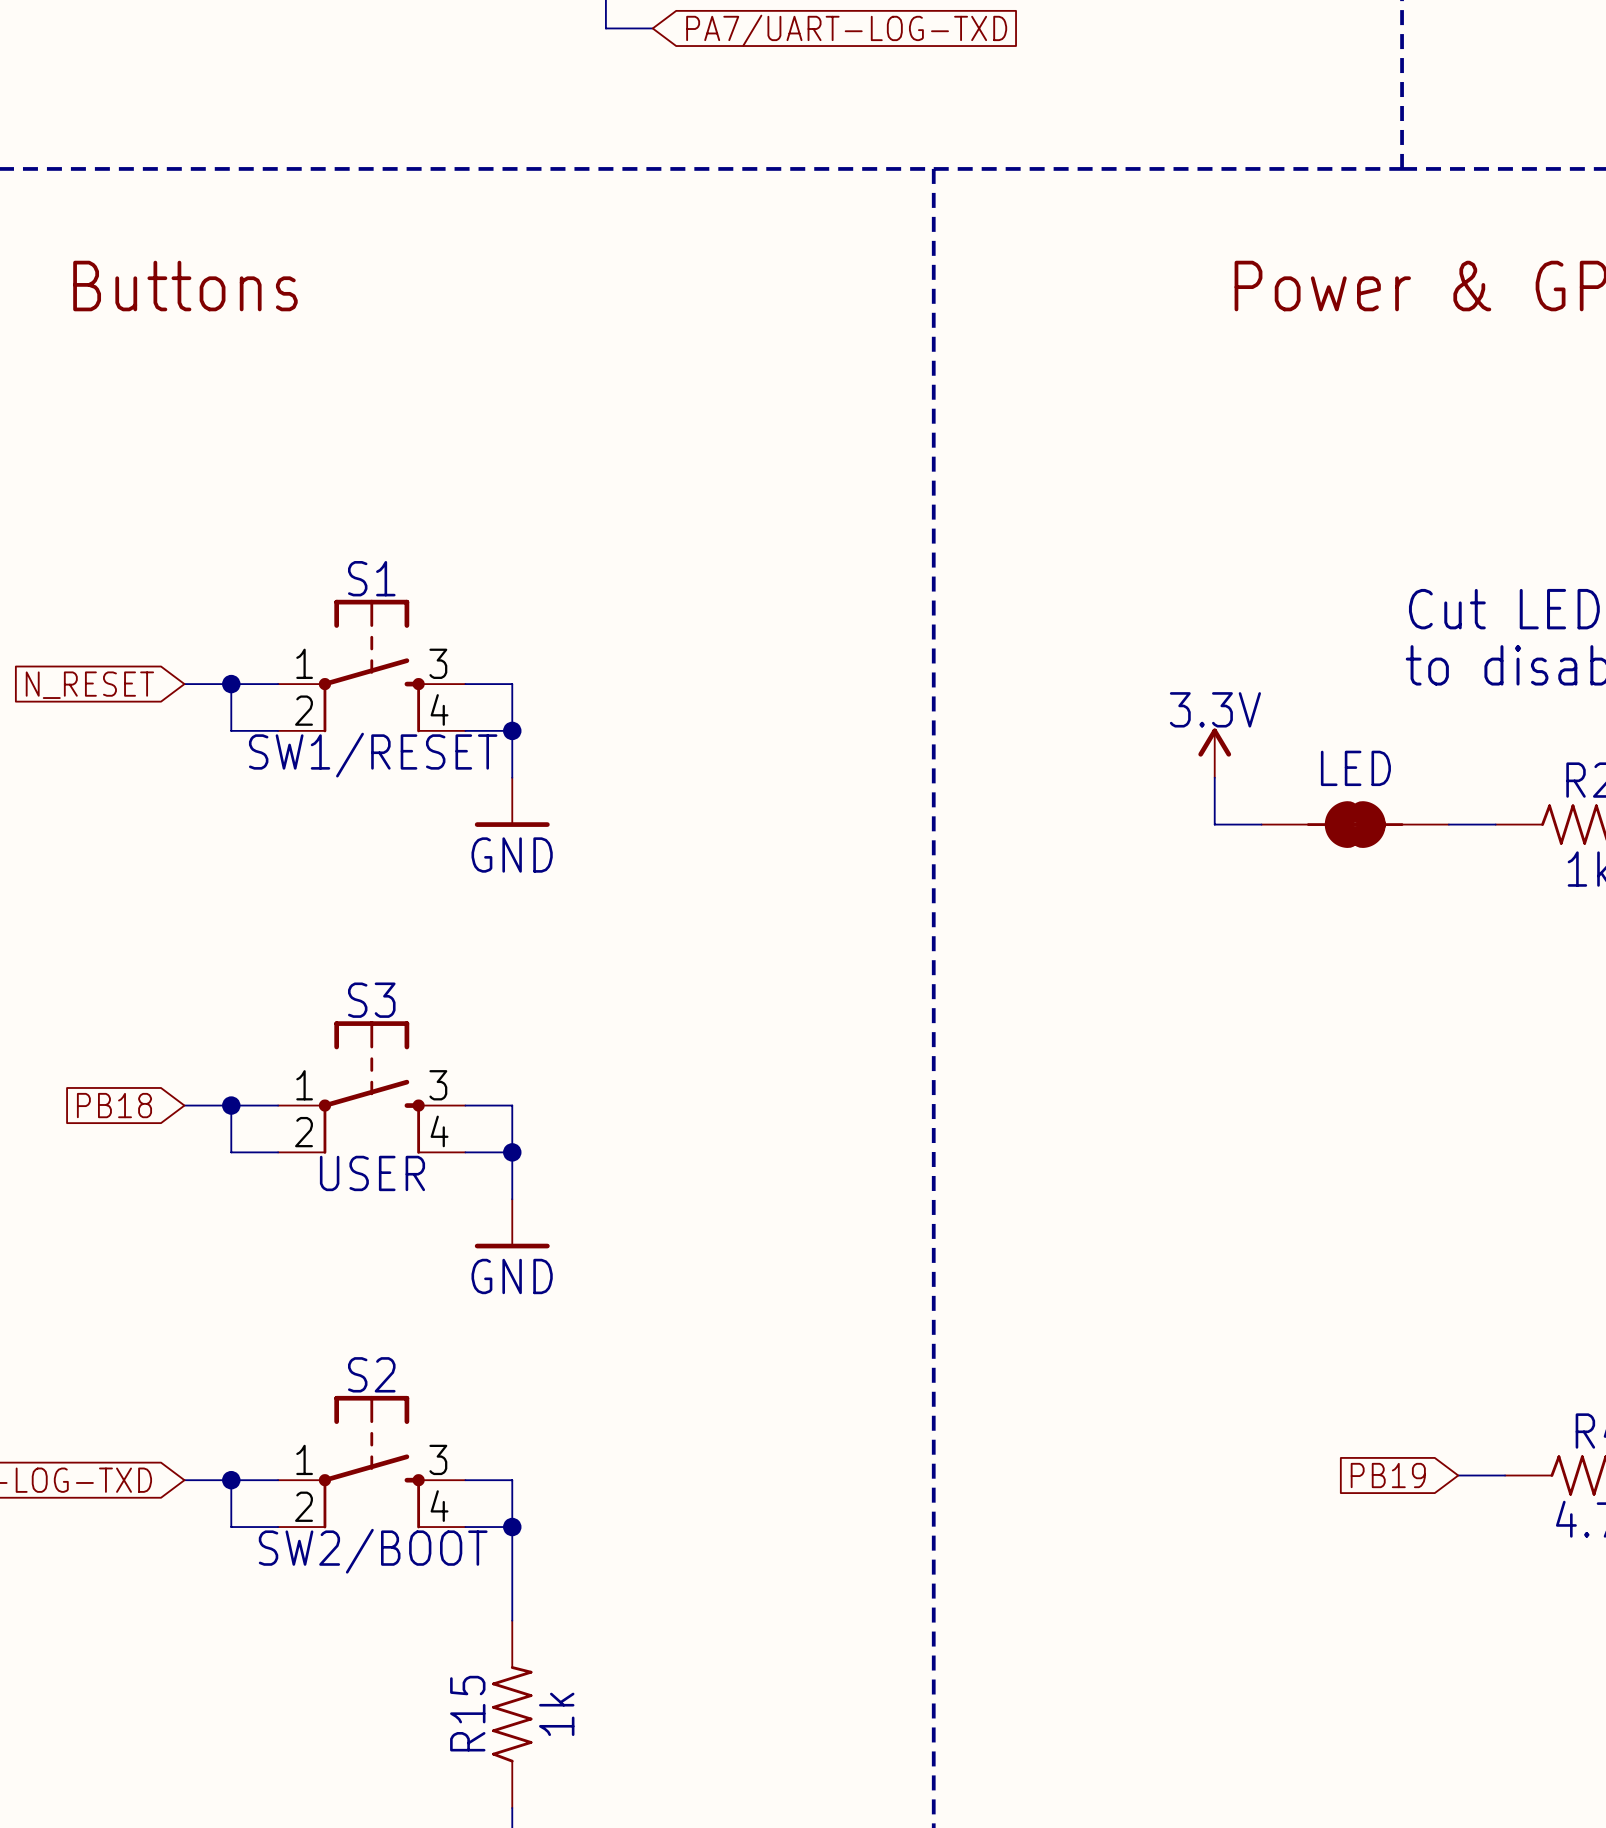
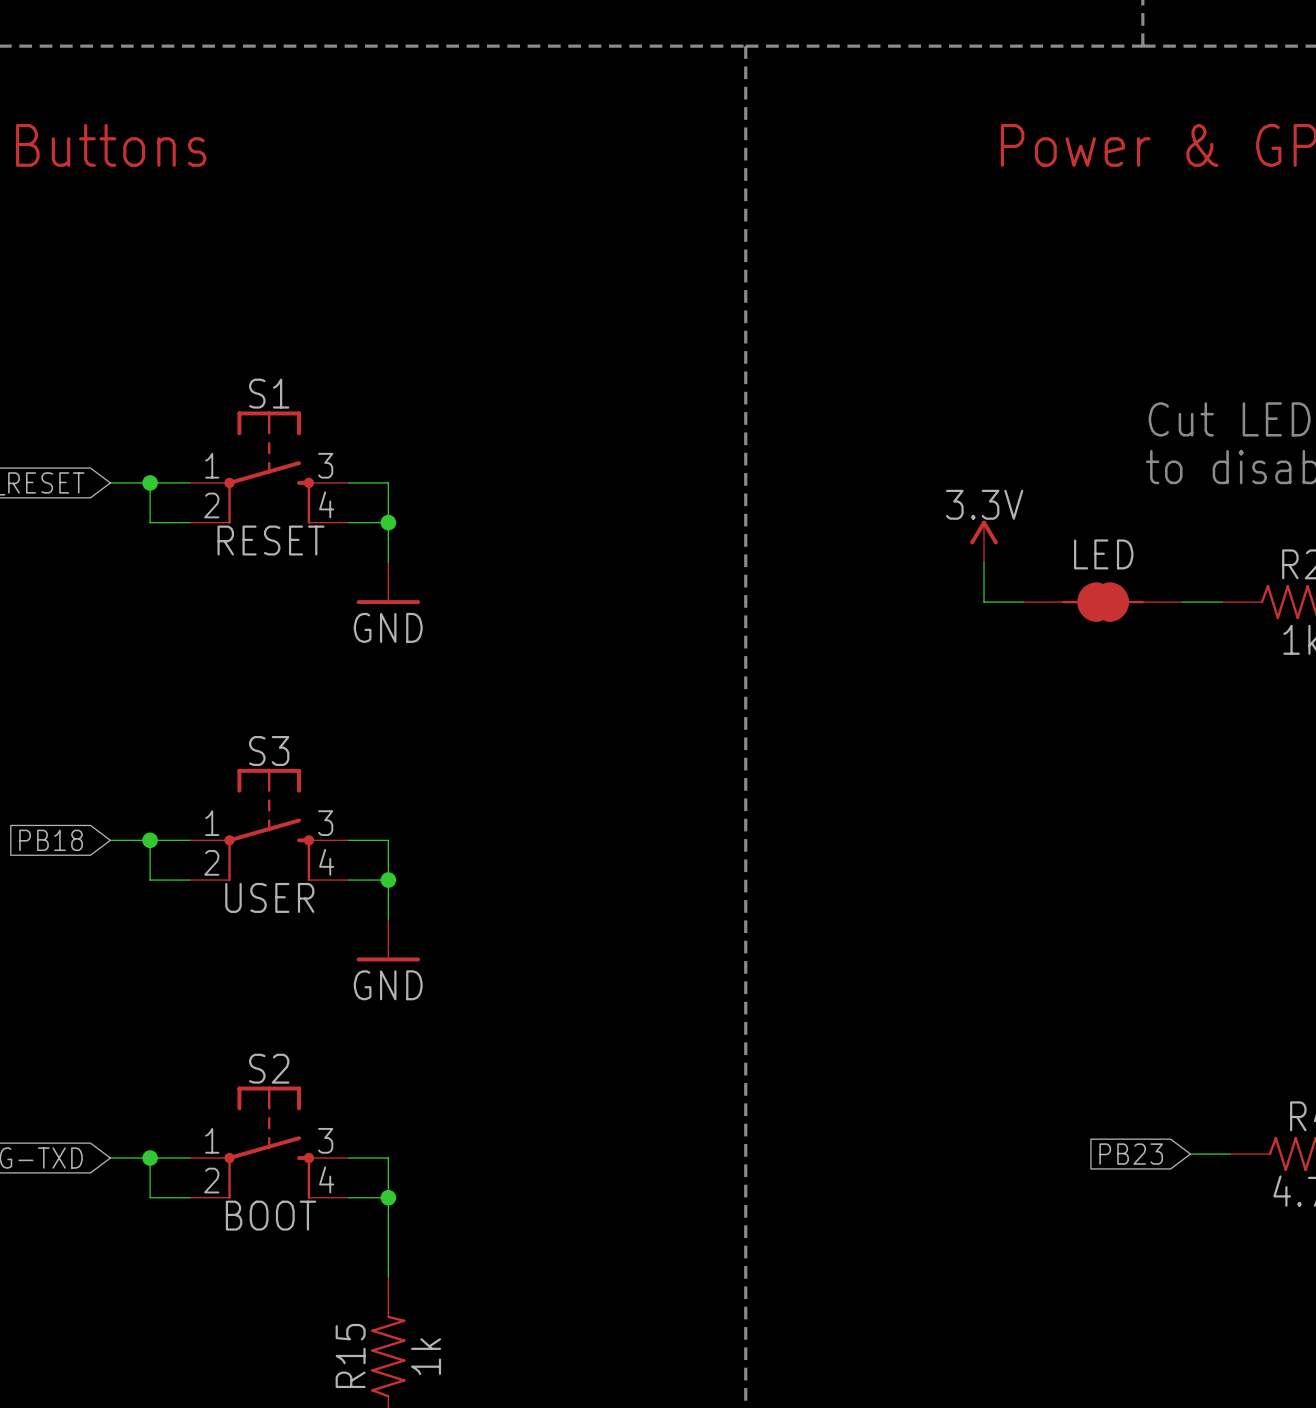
S1 value: SW1/RESET (373, 755) -> RESET (271, 540)
global label: PB19 (1388, 1475) -> PB23 (1131, 1154)
S2 value: SW2/BOOT (373, 1551) -> BOOT (271, 1215)

